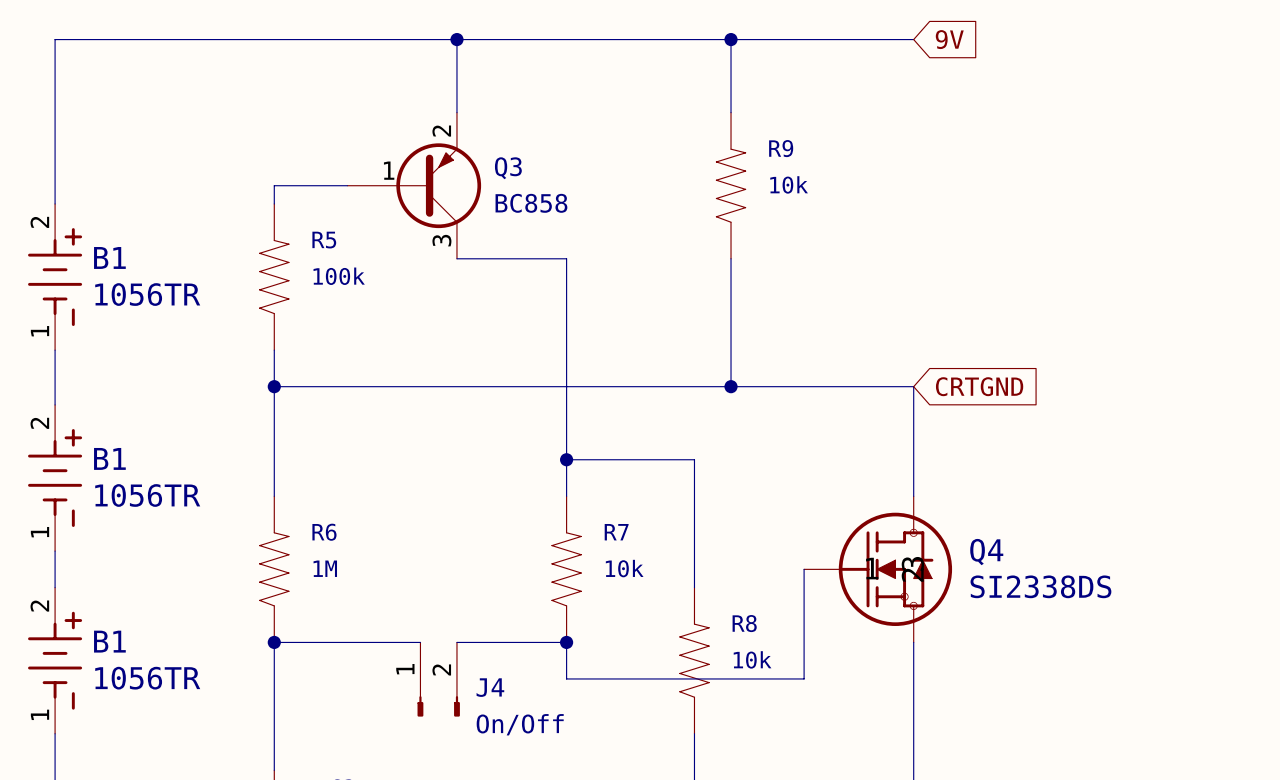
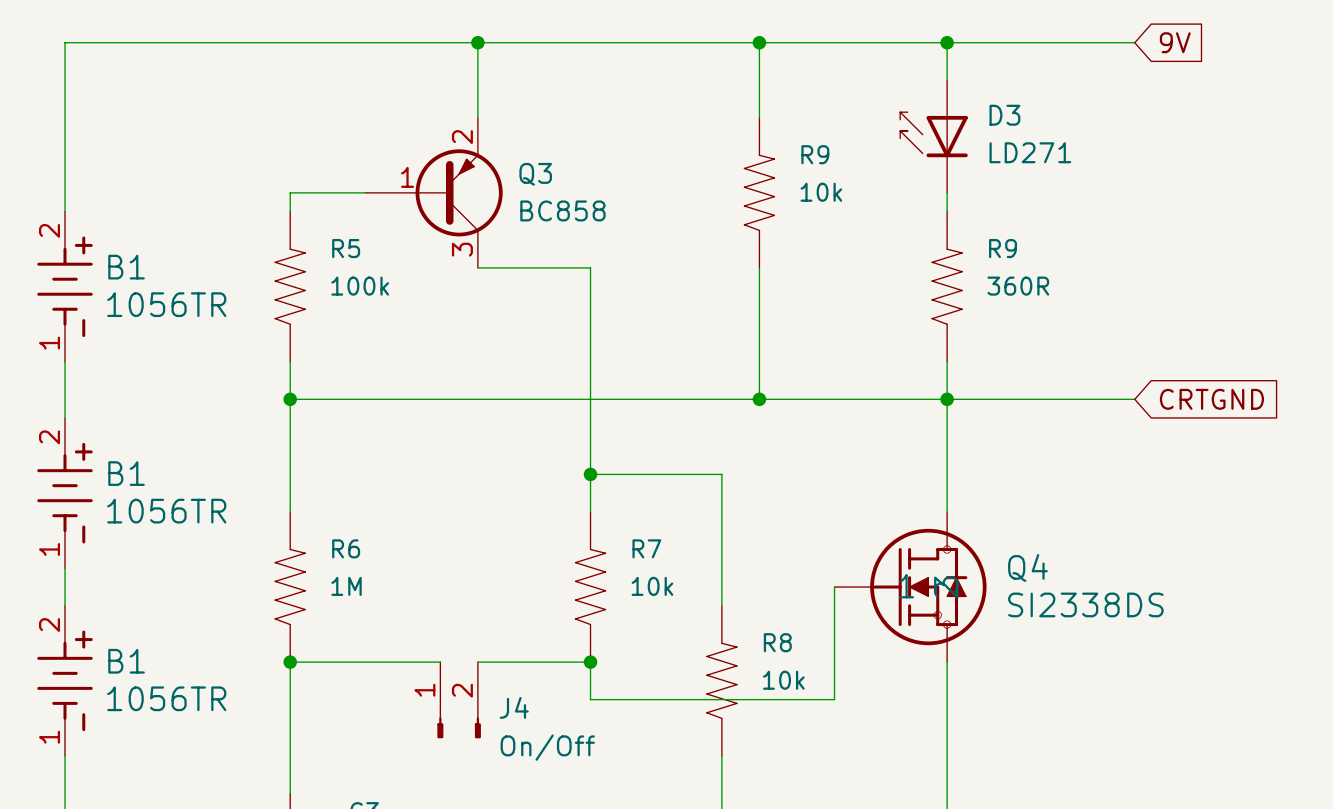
junction: none -> (947, 42)
global label position: 9V (949, 39) -> 9V (1175, 42)
wire: none -> (1134, 42) (947, 42) (947, 80)
D3: none -> LD271 (933, 136)
wire: none -> (947, 192) (947, 211)
R9: none -> 360R (947, 286)
wire: none -> (947, 361) (947, 399) (1134, 399)
junction: none -> (947, 399)
global label position: CRTGND (979, 386) -> CRTGND (1211, 399)

